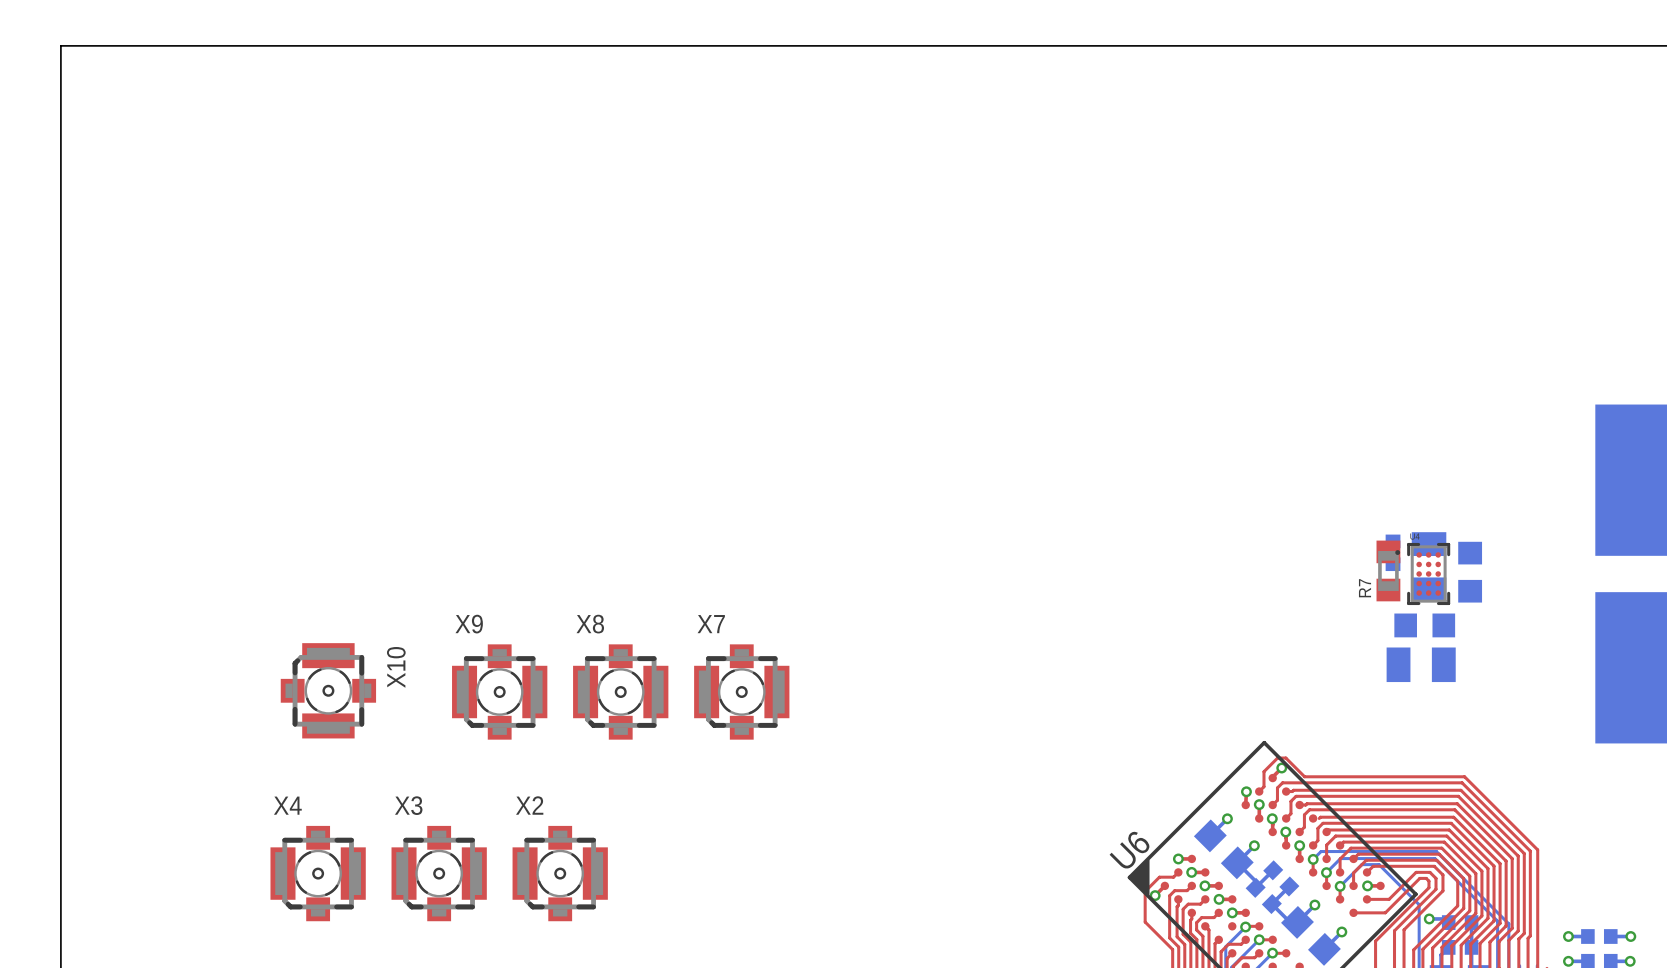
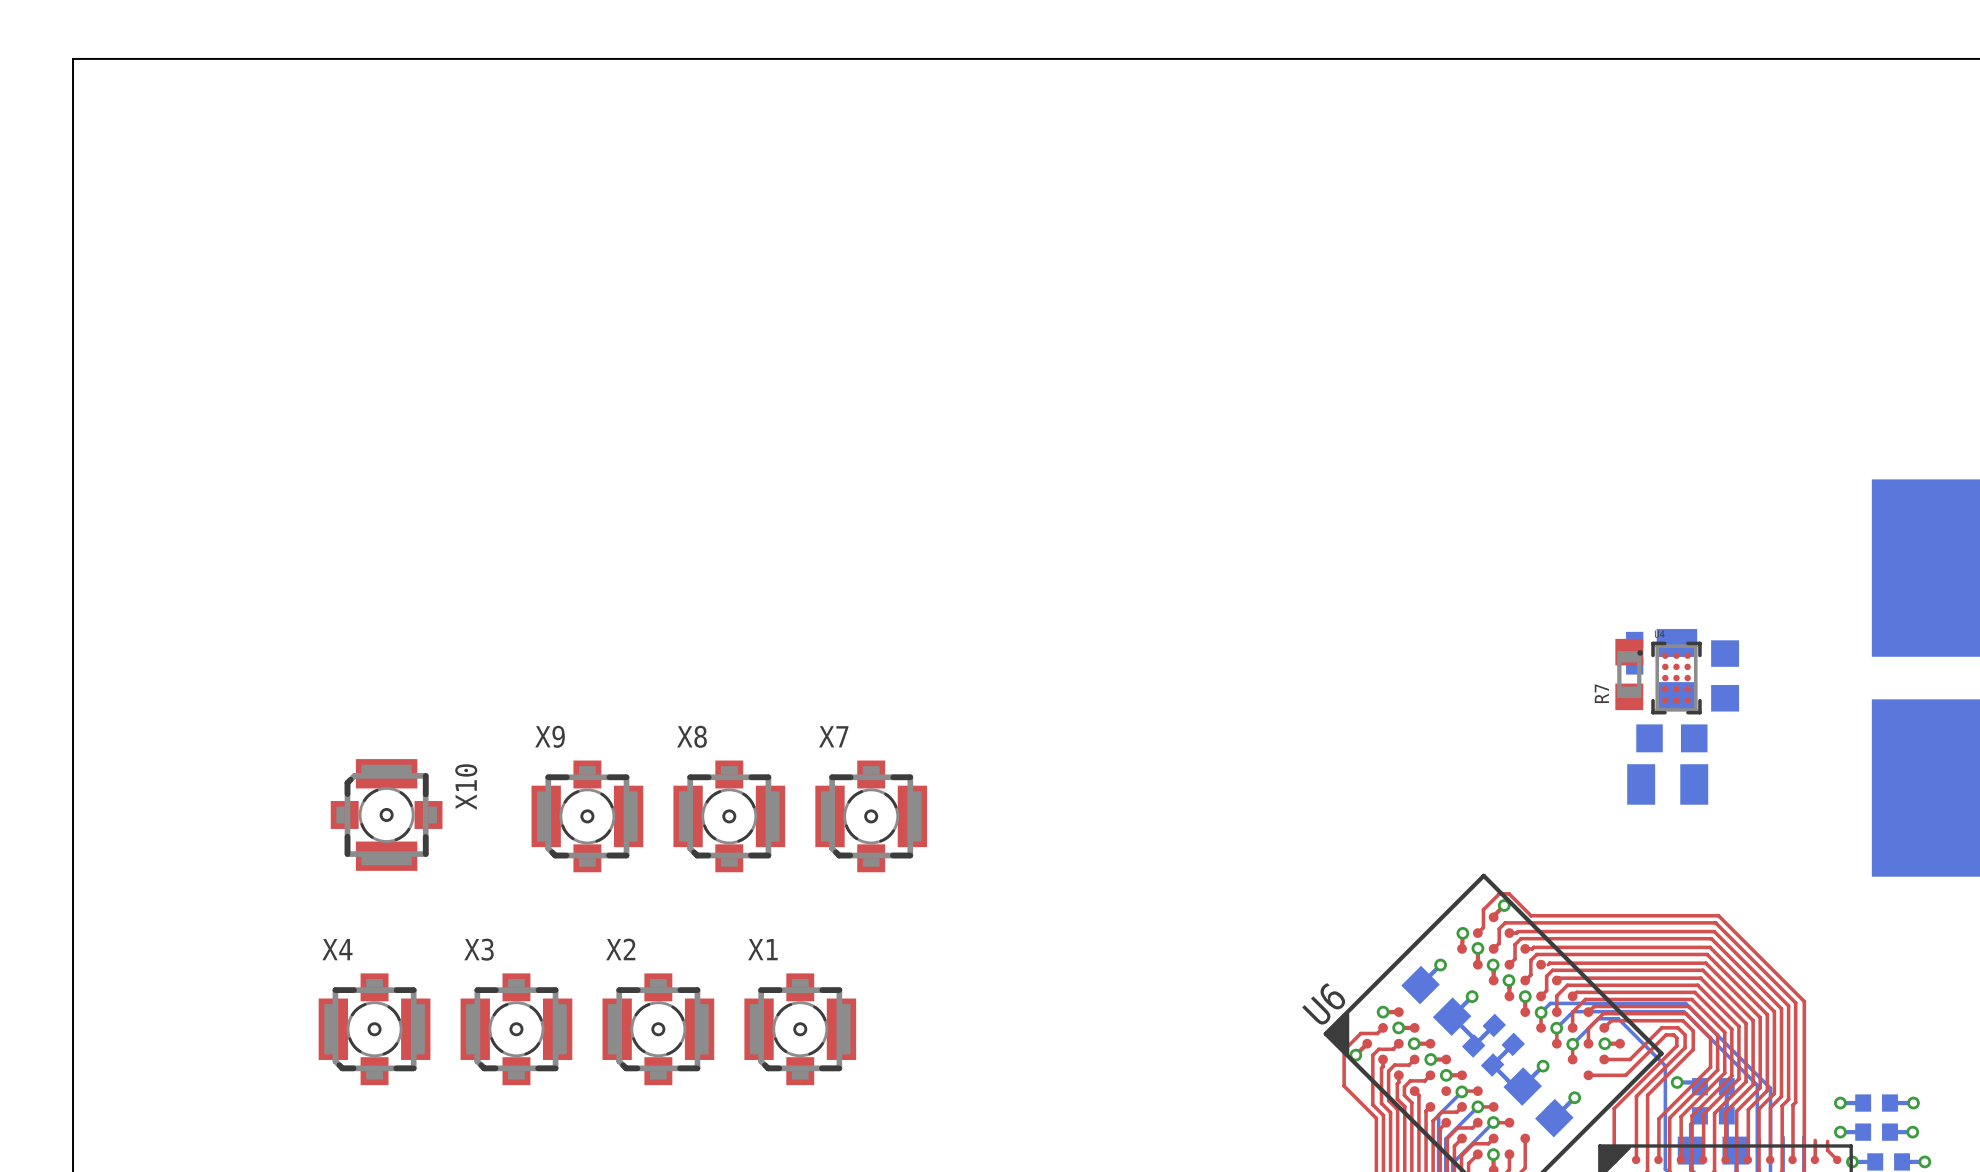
X1: none -> (800, 1029)

